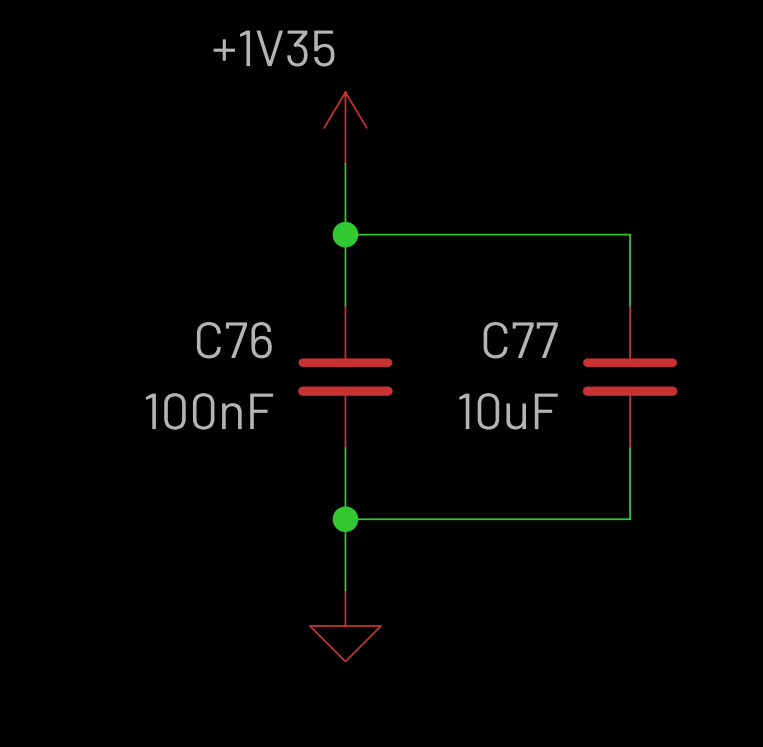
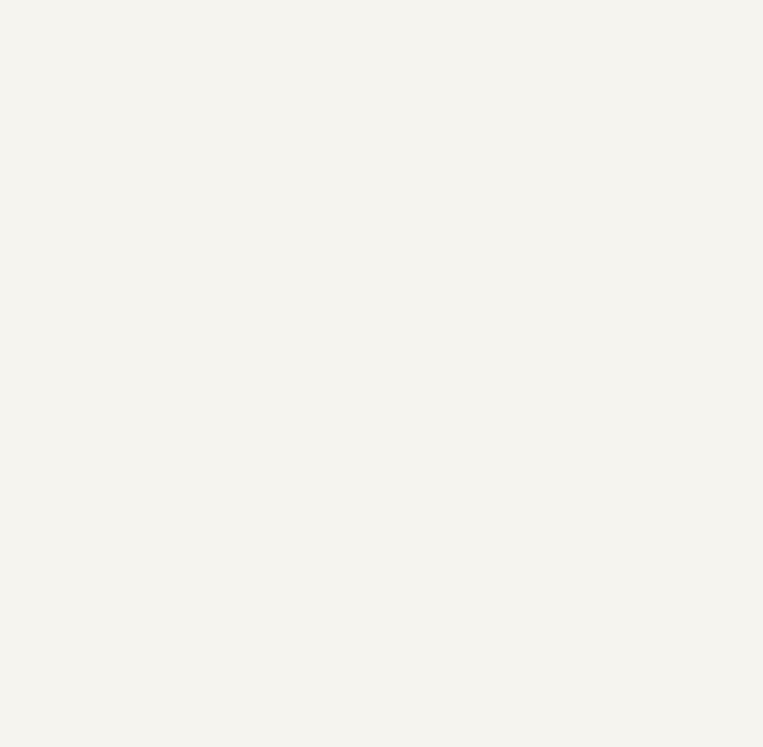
power symbol: +1V35 (345, 127) -> none
wire: (345, 163) (345, 305) -> none
wire: (345, 234) (630, 234) (630, 305) -> none
junction: (345, 234) -> none
C76: 100nF (345, 376) -> none
C77: 10uF (630, 376) -> none
wire: (345, 448) (345, 590) -> none
wire: (630, 448) (630, 519) (345, 519) -> none
junction: (345, 519) -> none
power symbol: (345, 625) -> none

